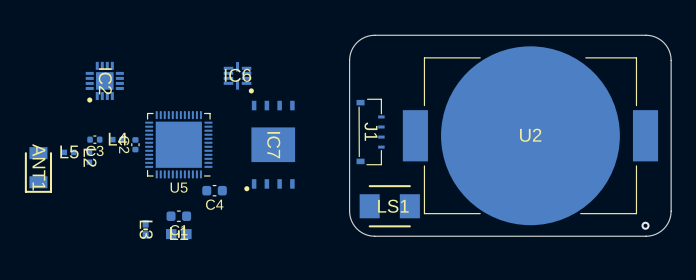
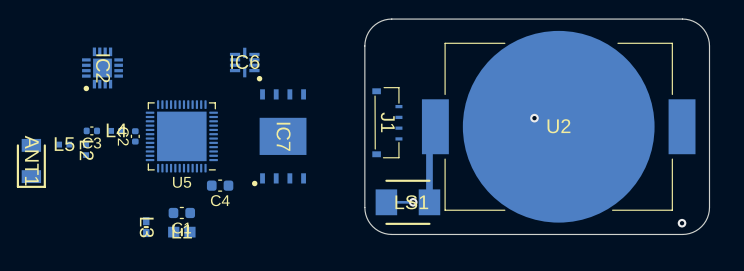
via: none -> (534, 118)
track: none -> (435, 126) (429, 132) (429, 202)
track: none -> (413, 202) (392, 202)
via: none -> (413, 202)

